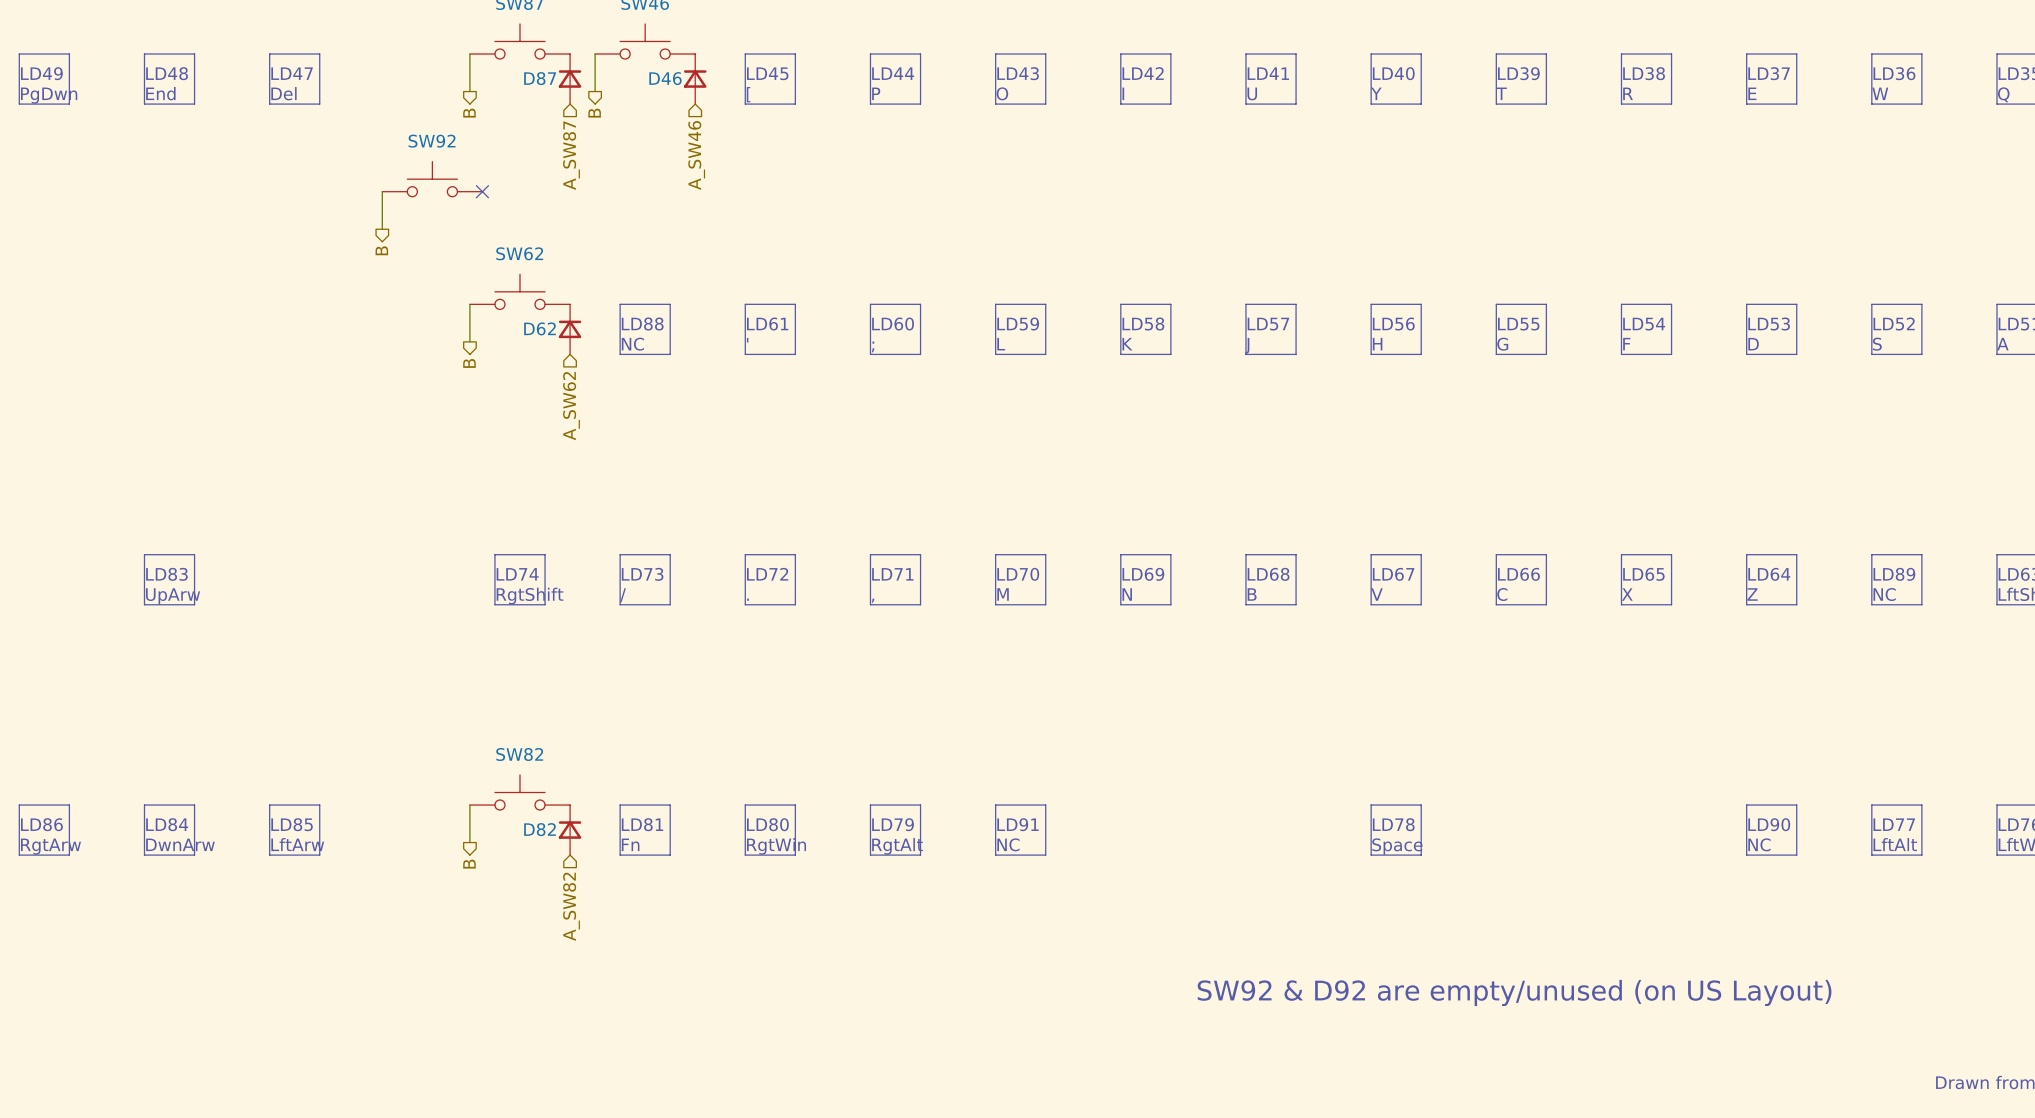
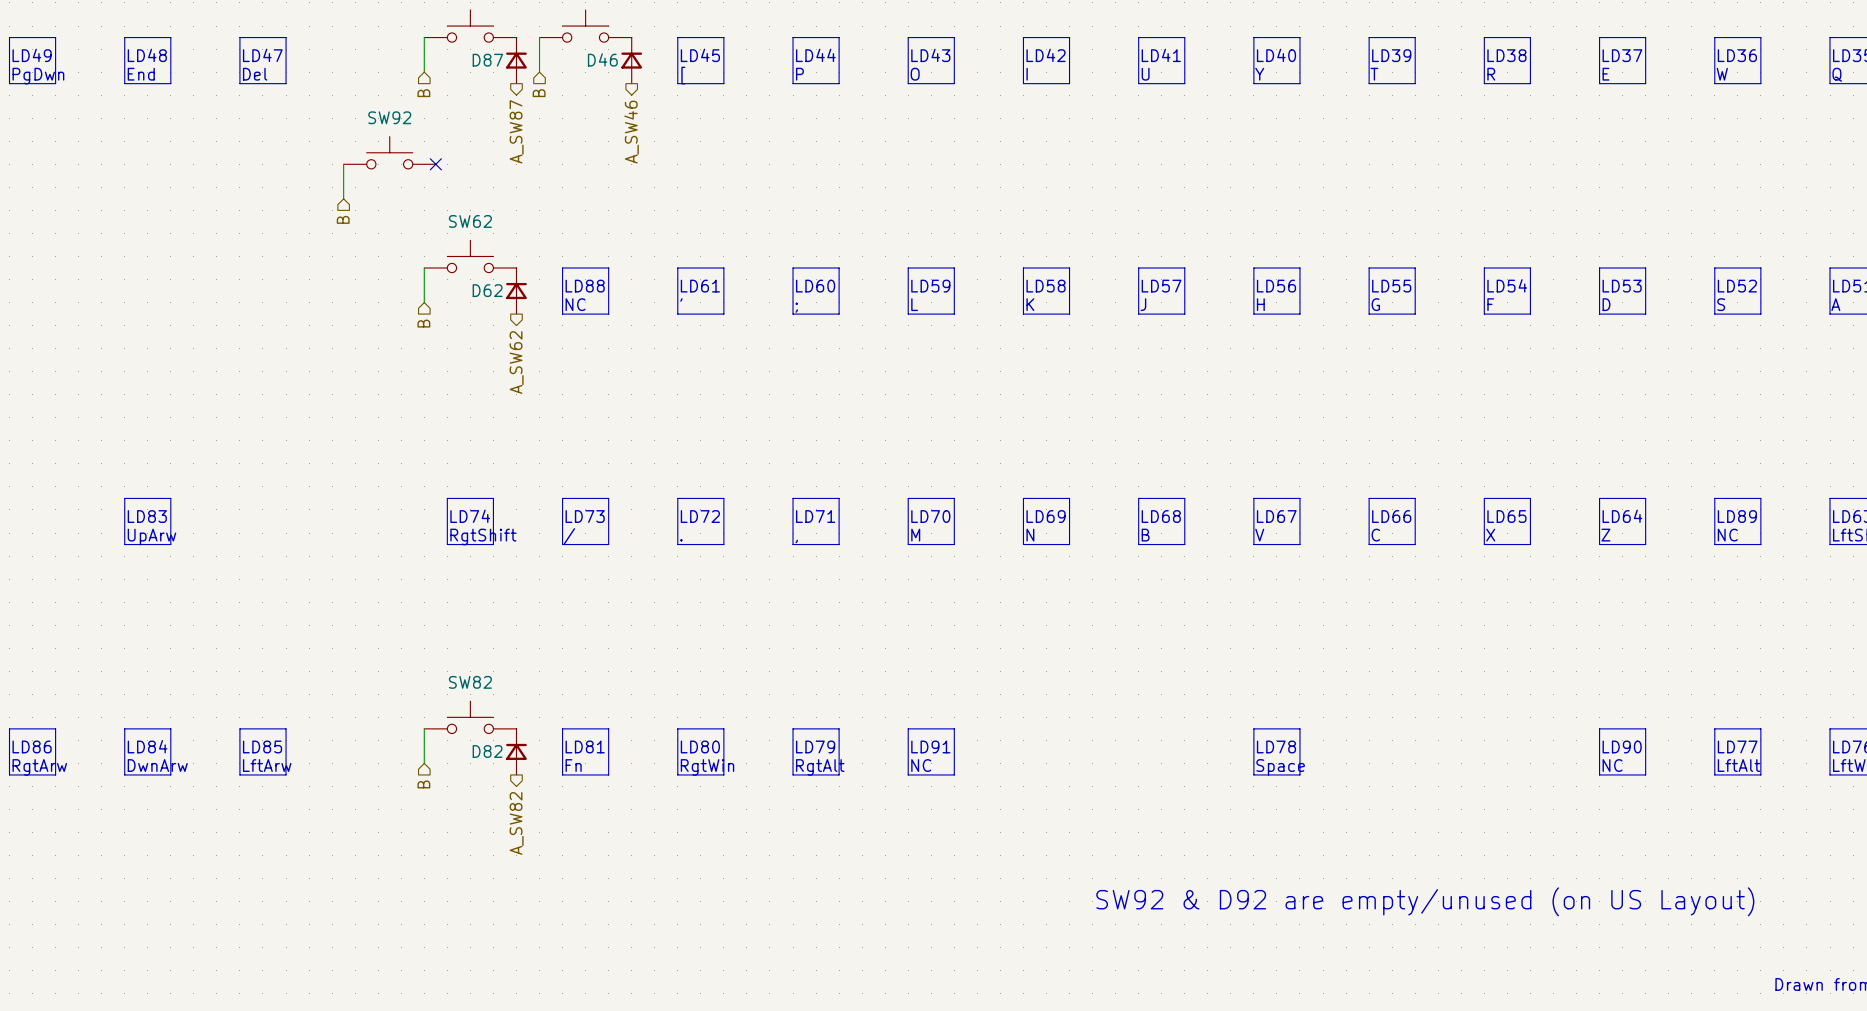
hierarchical label shape: output (469, 113) -> input (423, 93)
hierarchical label shape: output (594, 113) -> input (539, 93)
hierarchical label shape: input (571, 155) -> output (516, 131)
hierarchical label shape: input (696, 155) -> output (631, 132)
hierarchical label shape: output (381, 250) -> input (343, 219)
hierarchical label shape: output (469, 363) -> input (423, 323)
hierarchical label shape: input (571, 406) -> output (516, 362)
hierarchical label shape: output (469, 864) -> input (423, 784)
hierarchical label shape: input (571, 906) -> output (516, 823)

